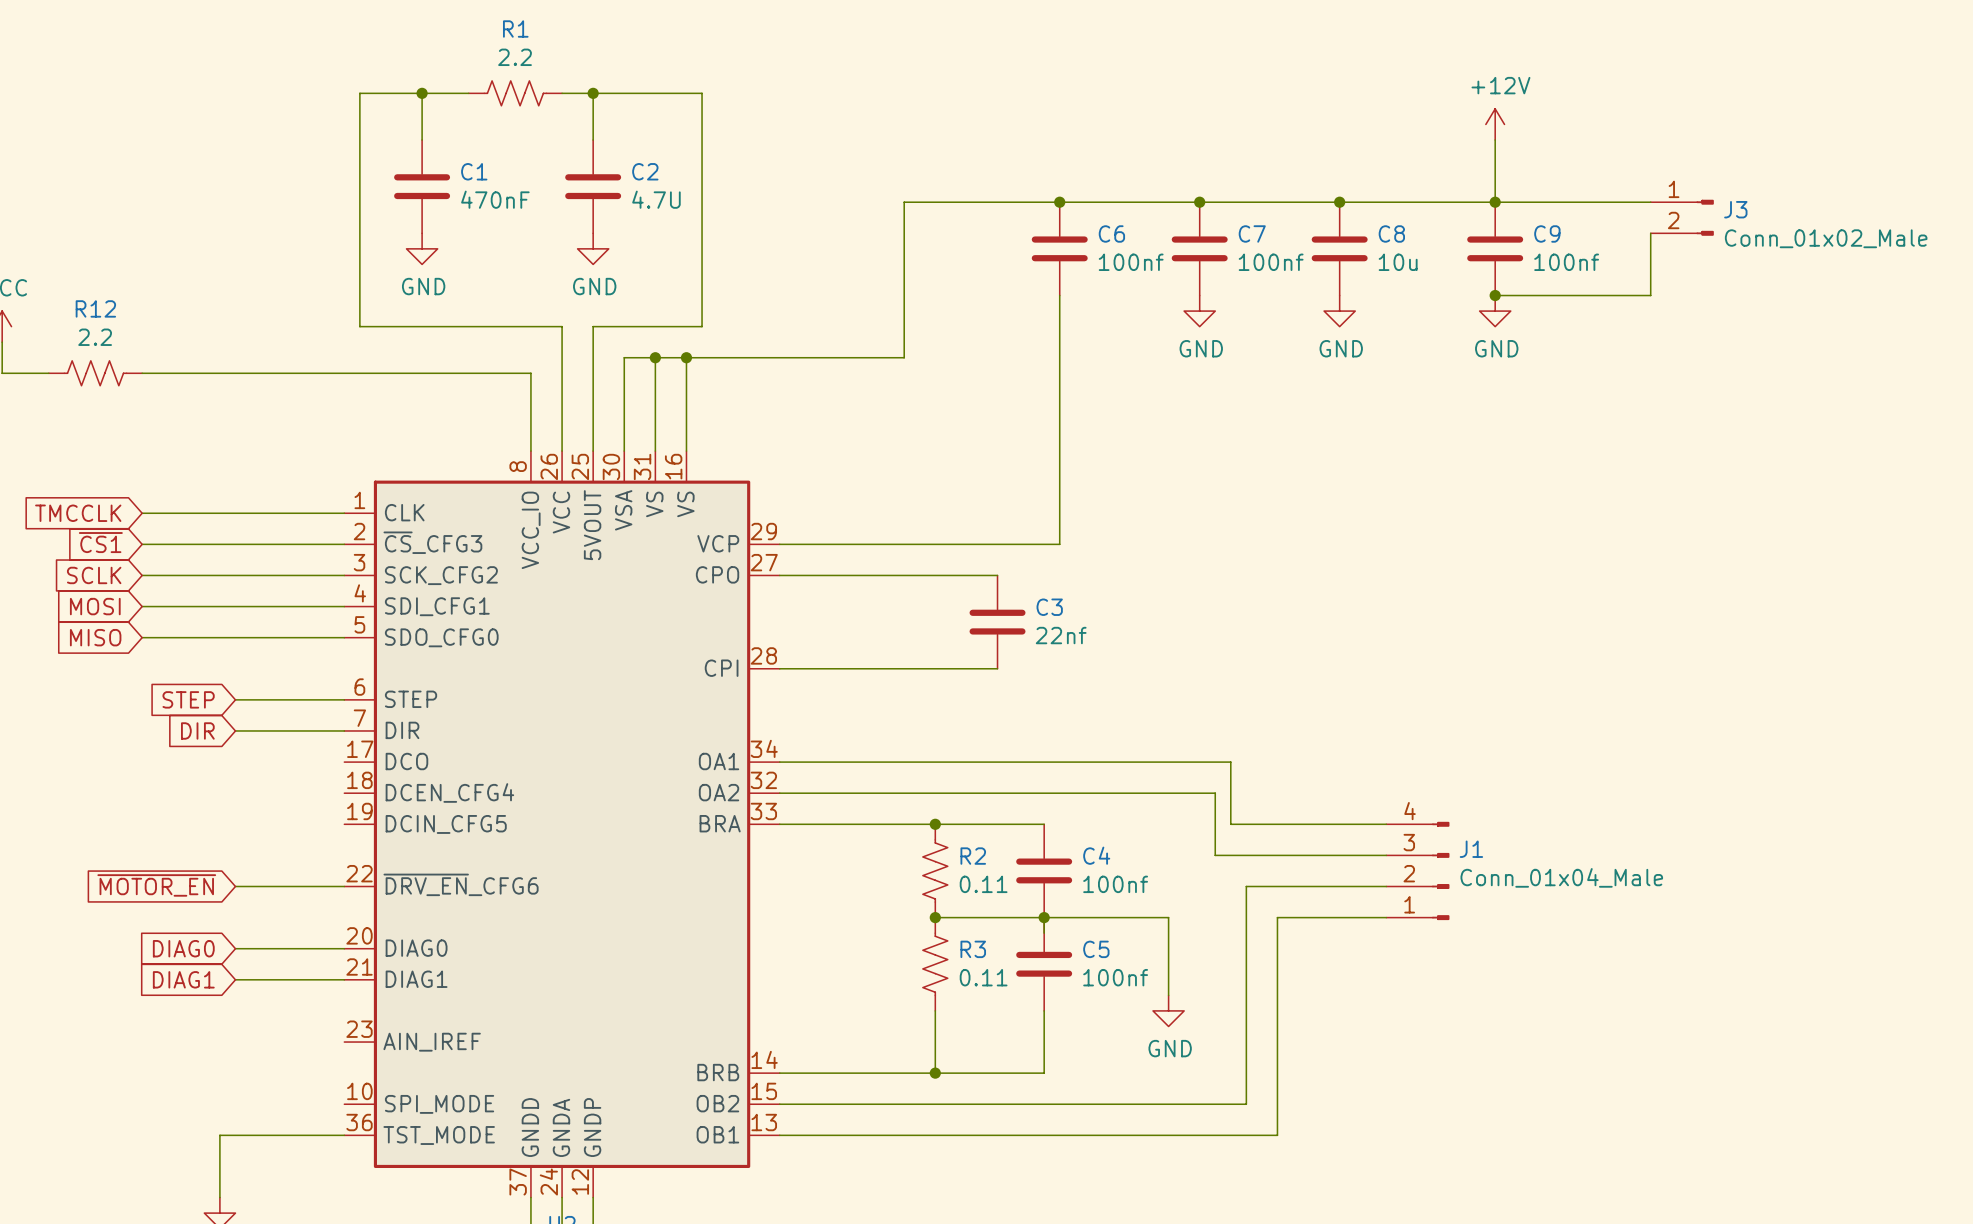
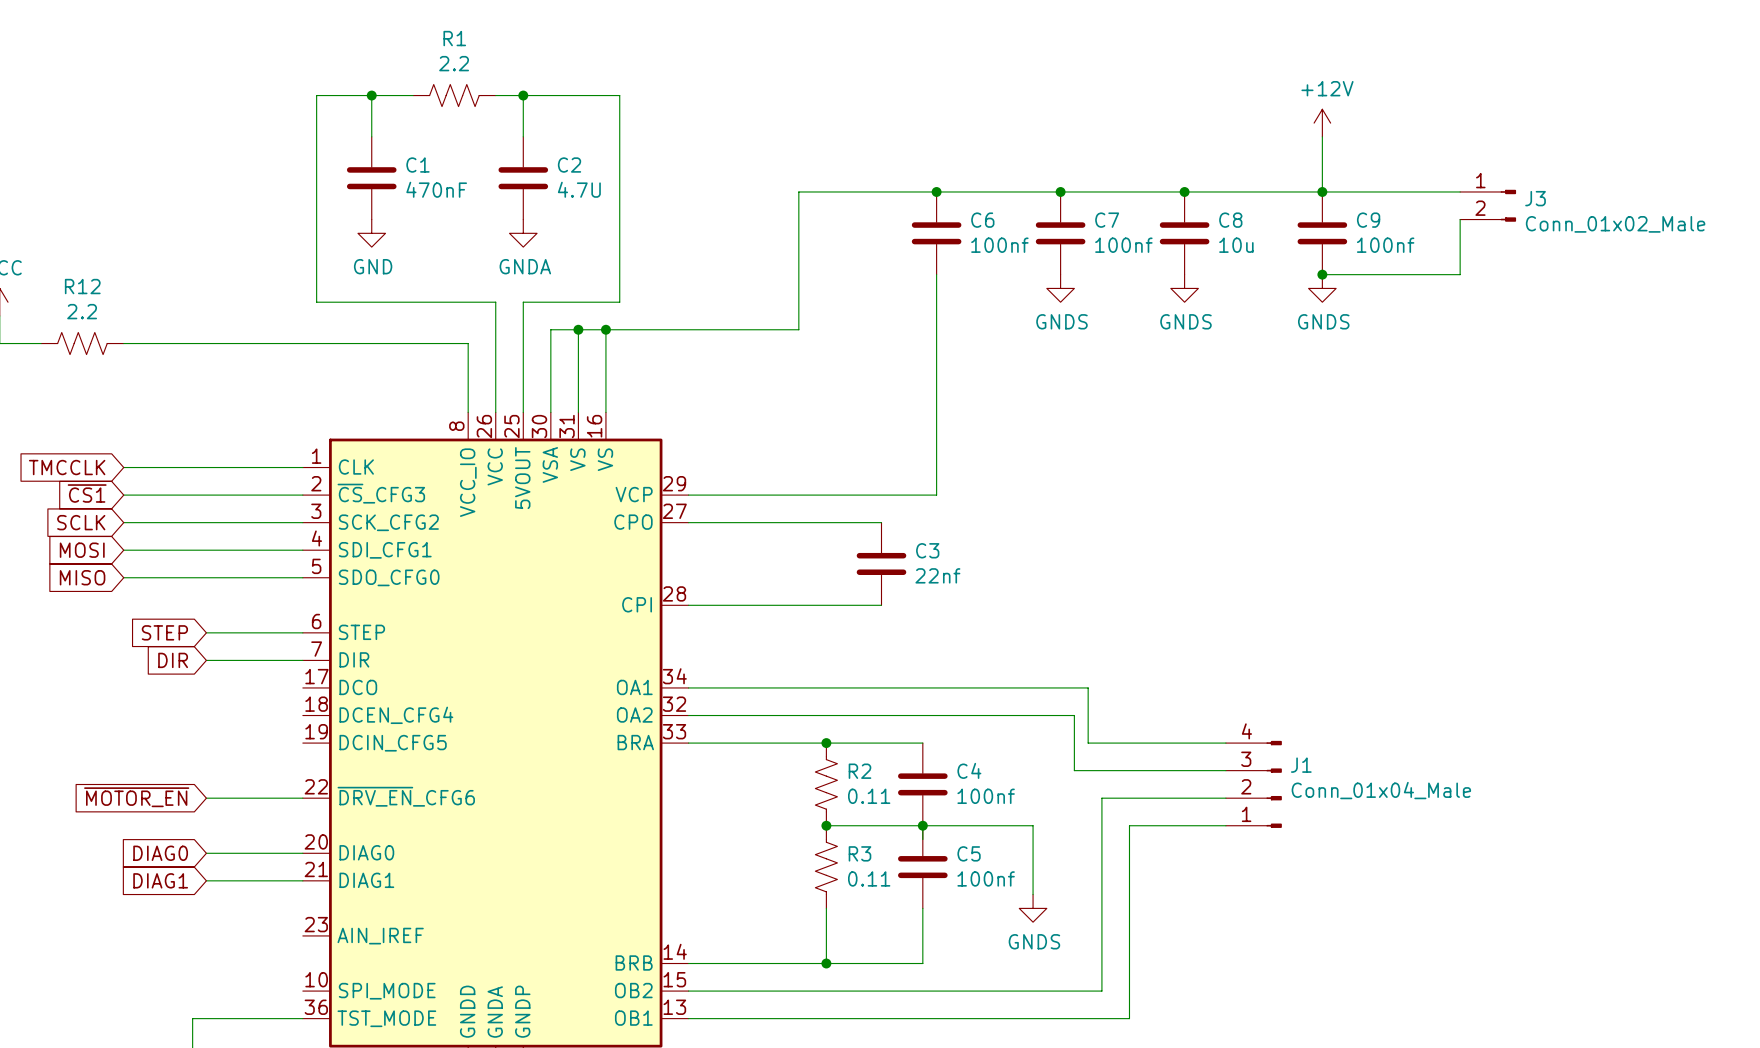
power symbol: GND (593, 248) -> GNDA (523, 233)
power symbol: GND (1199, 311) -> GNDS (1060, 288)
power symbol: GND (1339, 311) -> GNDS (1184, 288)
power symbol: GND (1495, 311) -> GNDS (1322, 288)
power symbol: GND (1168, 1010) -> GNDS (1033, 908)

